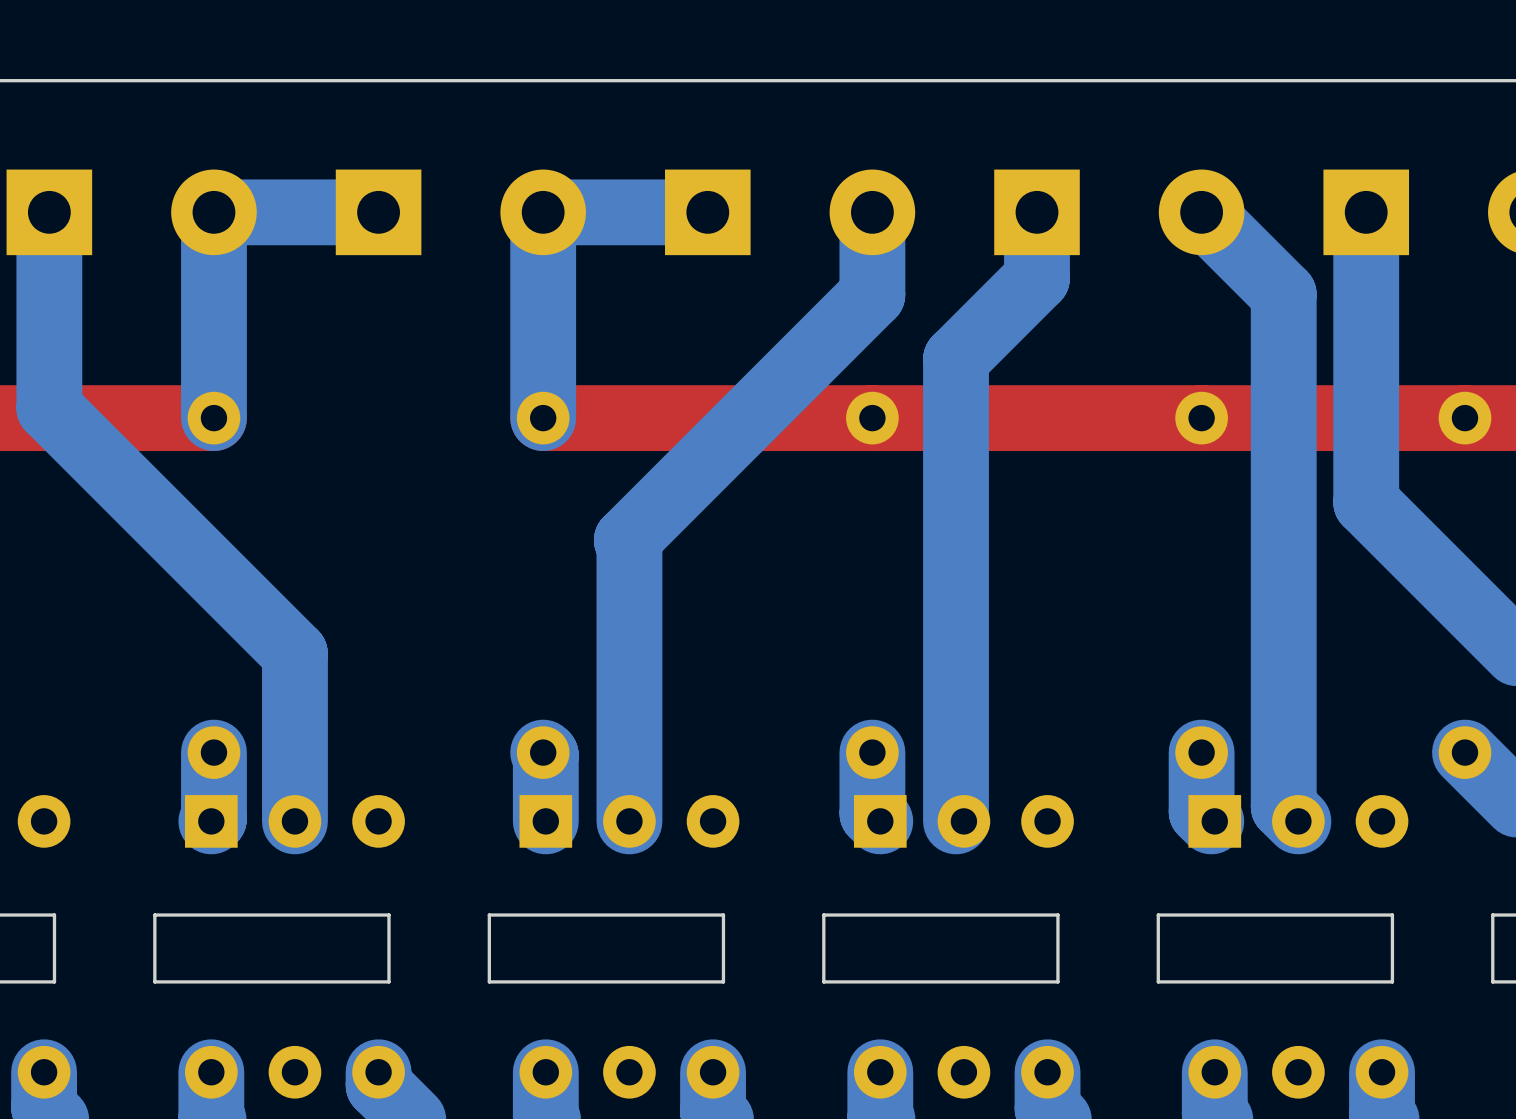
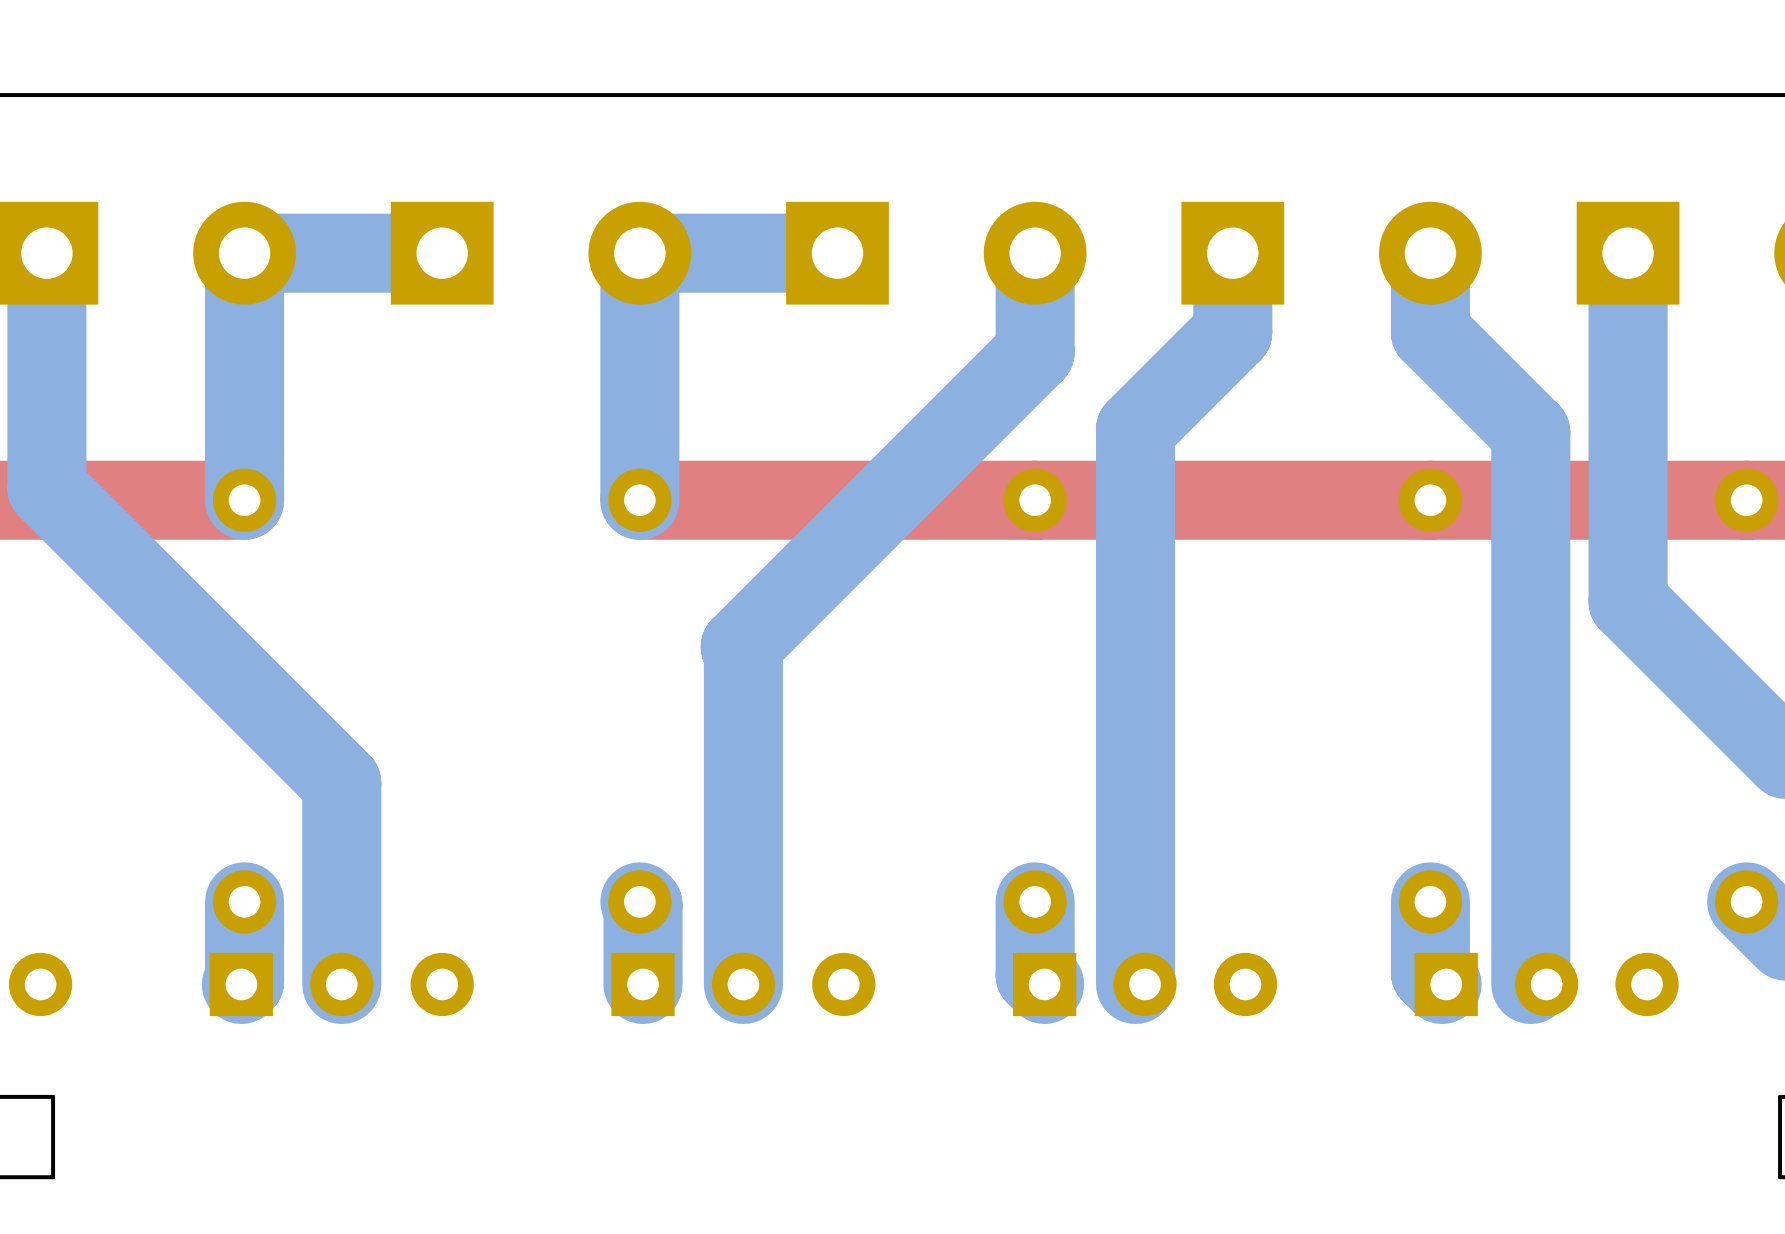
bottom track: (1201, 212) (1283, 294) (1283, 806) (1298, 821) -> (1430, 253) (1430, 332) (1530, 432) (1530, 984)
board edge: (388, 915) (154, 915) (154, 981) (388, 981) (388, 915) -> none
board edge: (723, 915) (489, 915) (489, 981) (723, 981) (723, 915) -> none
board edge: (1057, 915) (823, 915) (823, 981) (1057, 981) (1057, 915) -> none
board edge: (1392, 915) (1158, 915) (1158, 981) (1392, 981) (1392, 915) -> none

